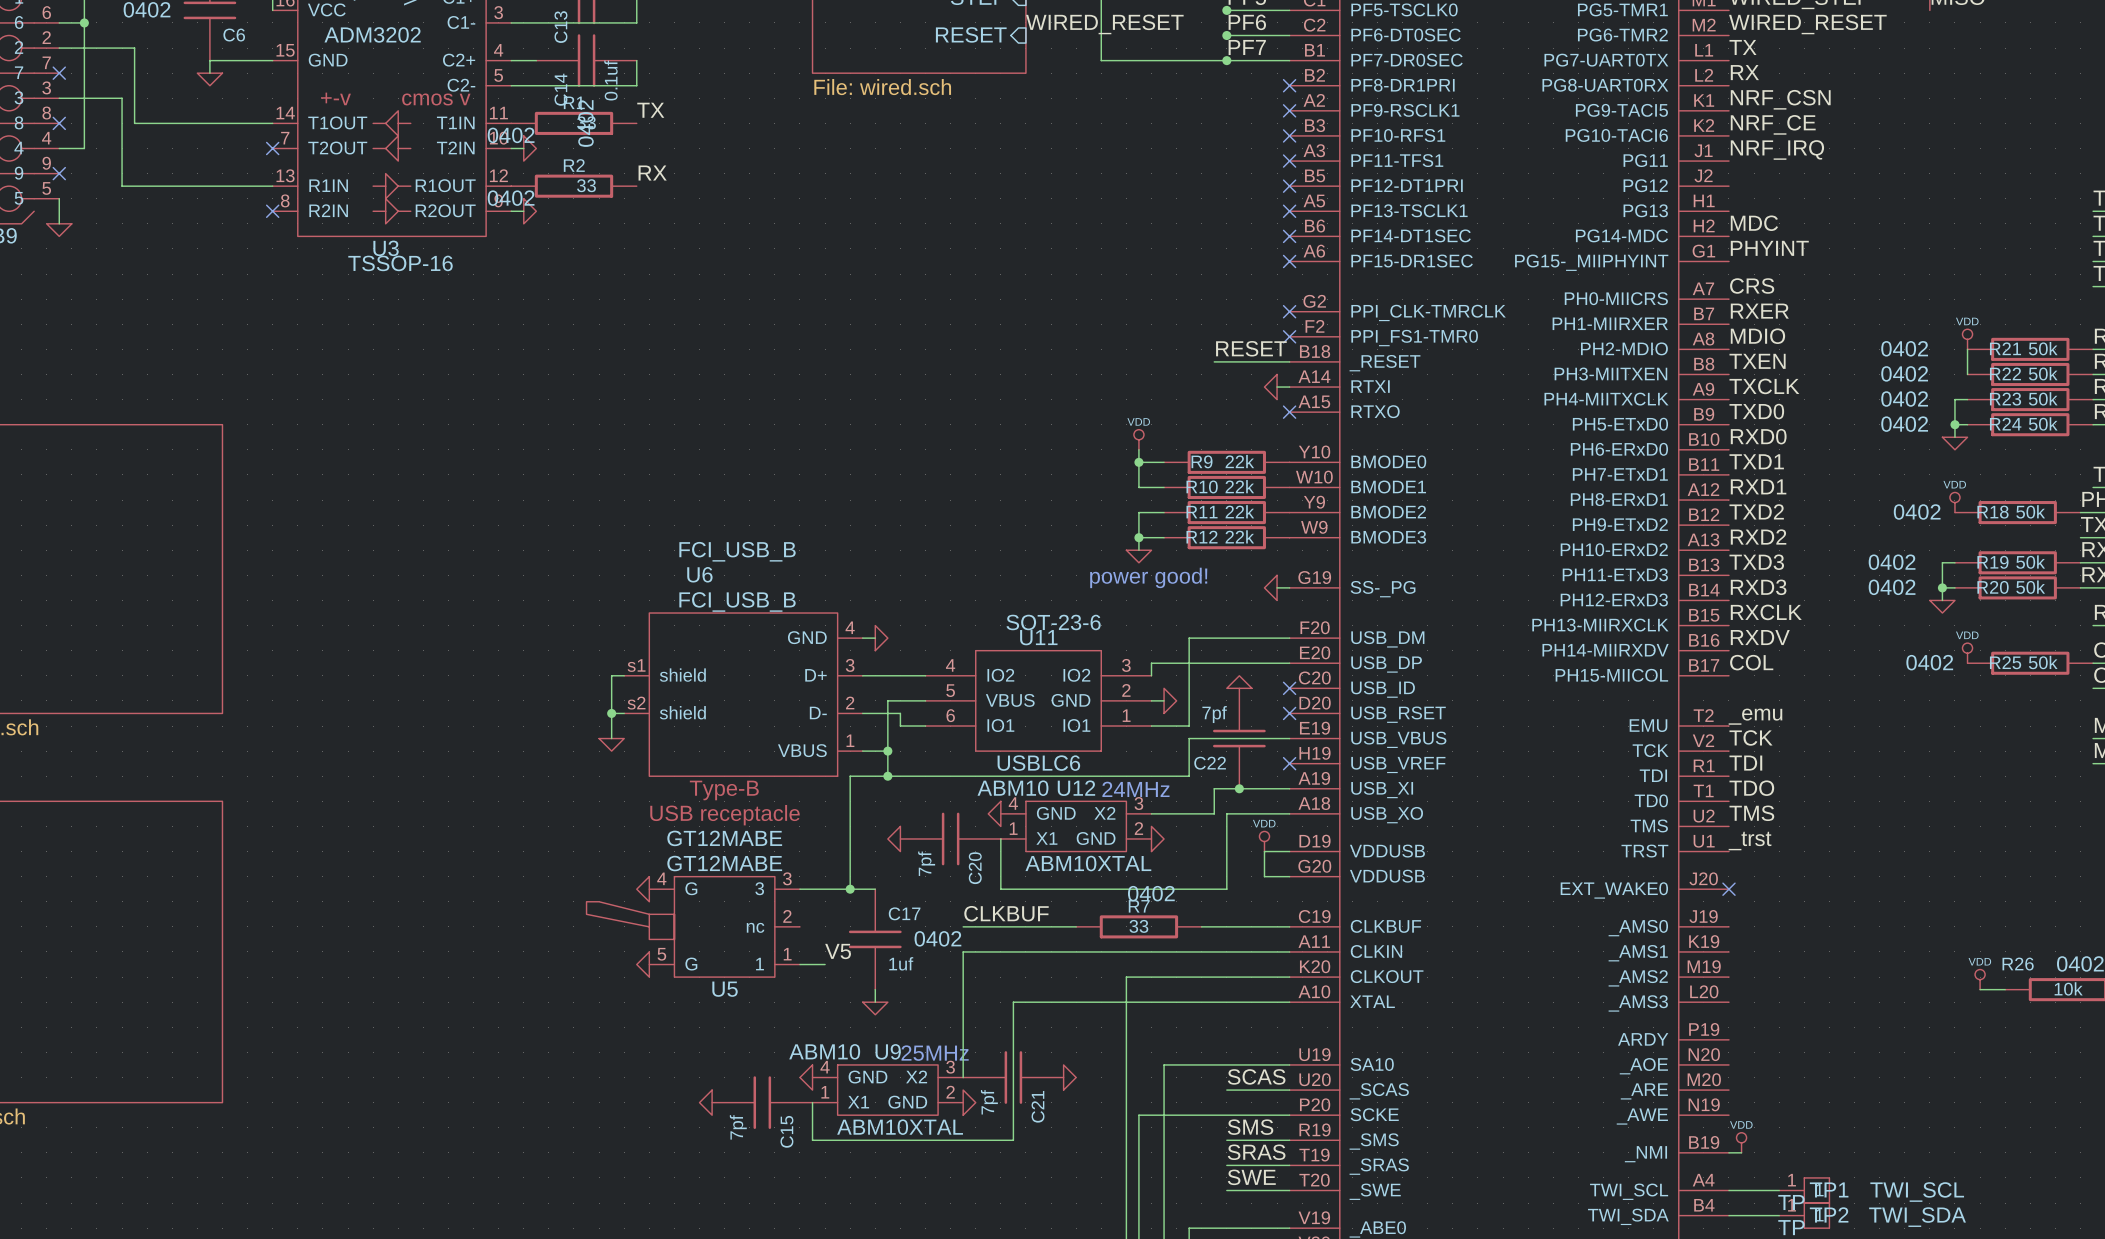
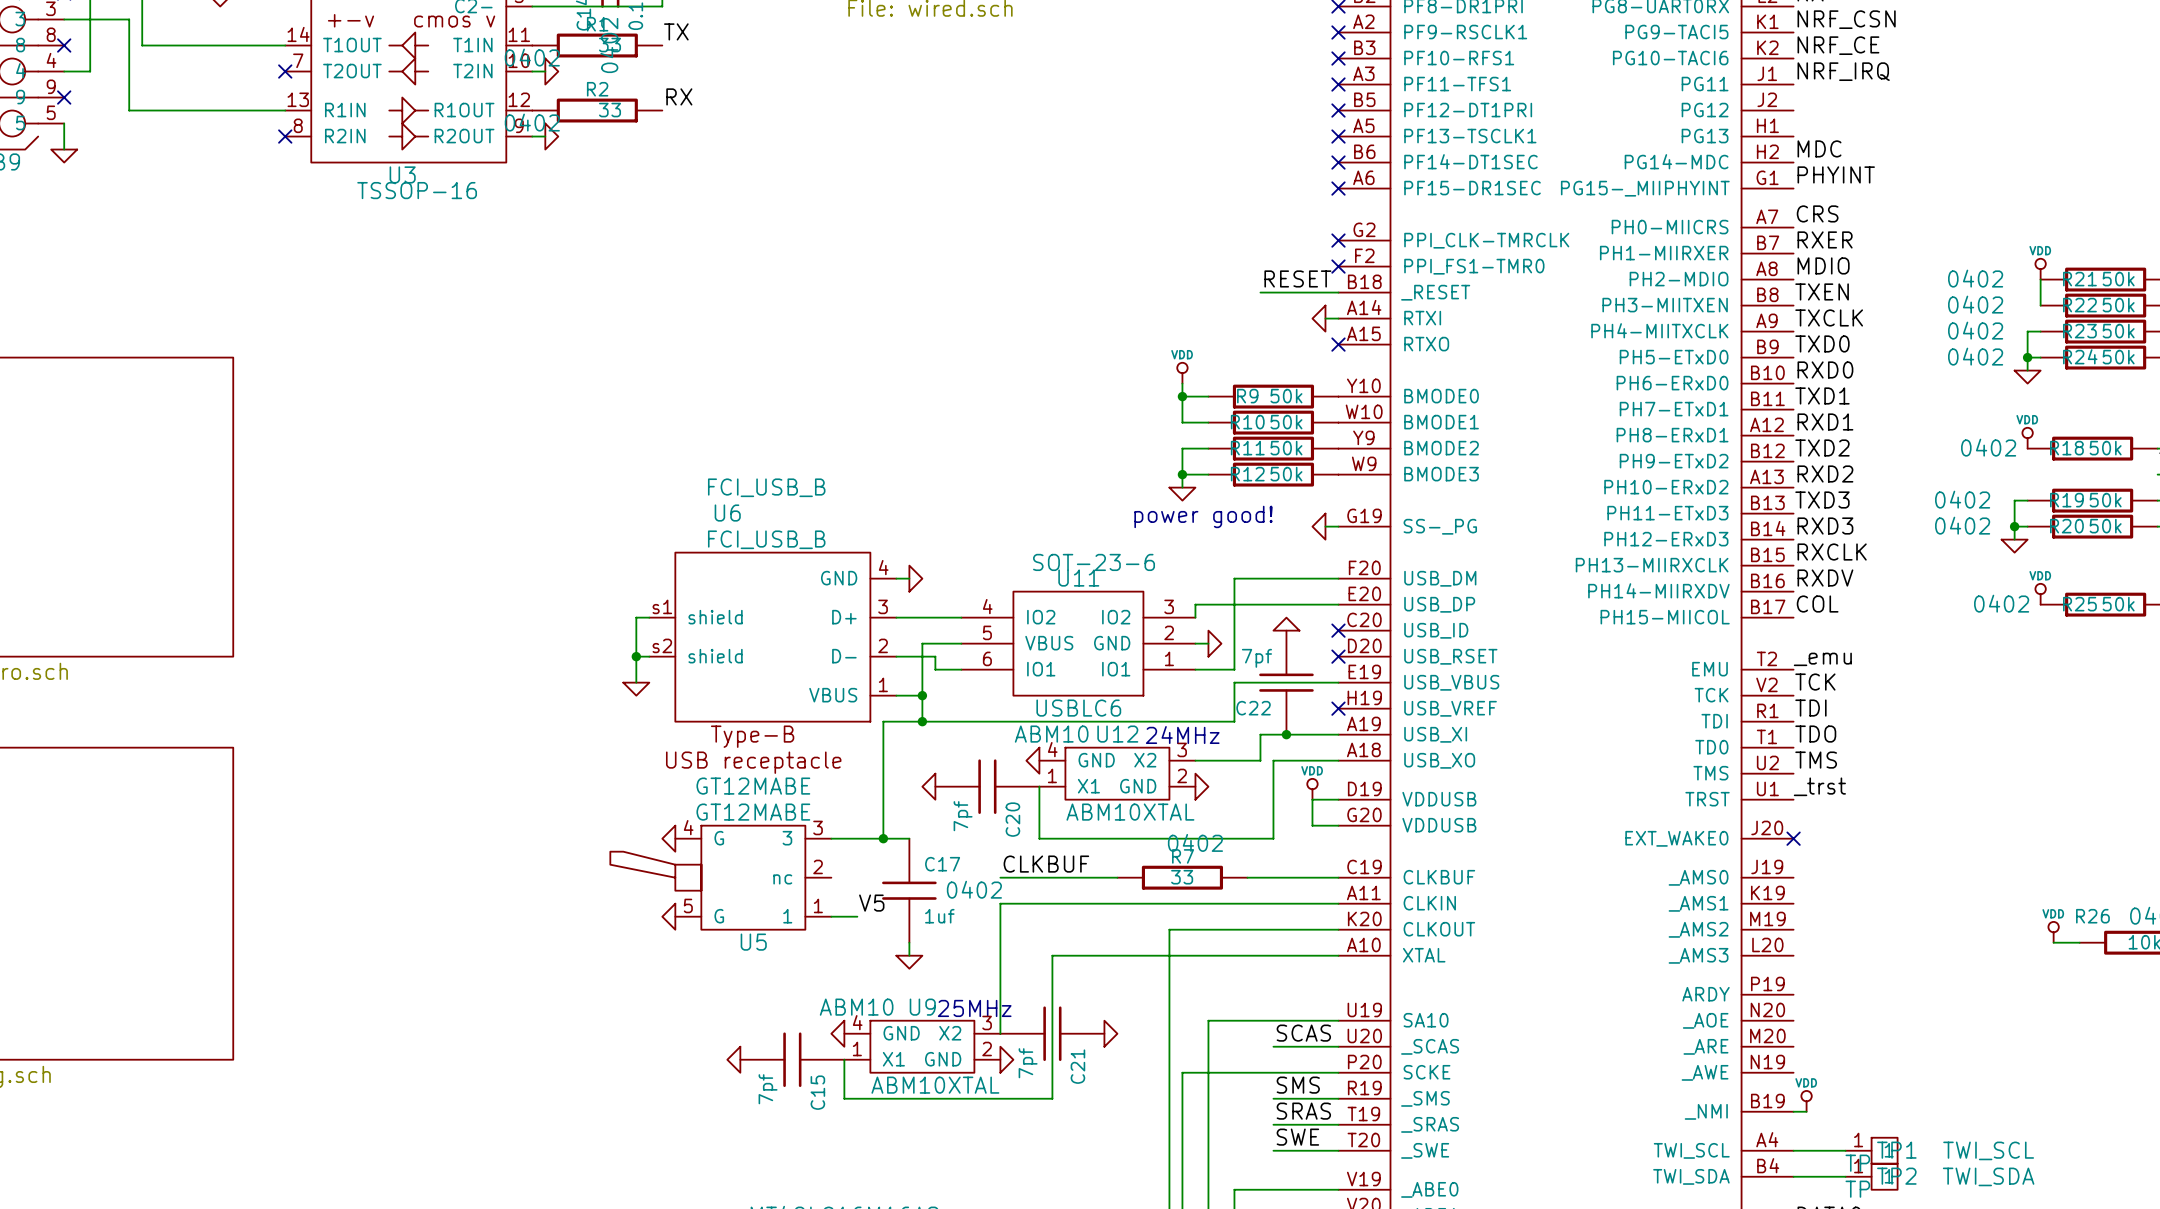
R9 value: 22k (1239, 461) -> 50k (1286, 396)
R10 value: 22k (1239, 486) -> 50k (1286, 422)
R11 value: 22k (1239, 511) -> 50k (1286, 448)
R12 value: 22k (1239, 536) -> 50k (1286, 474)

